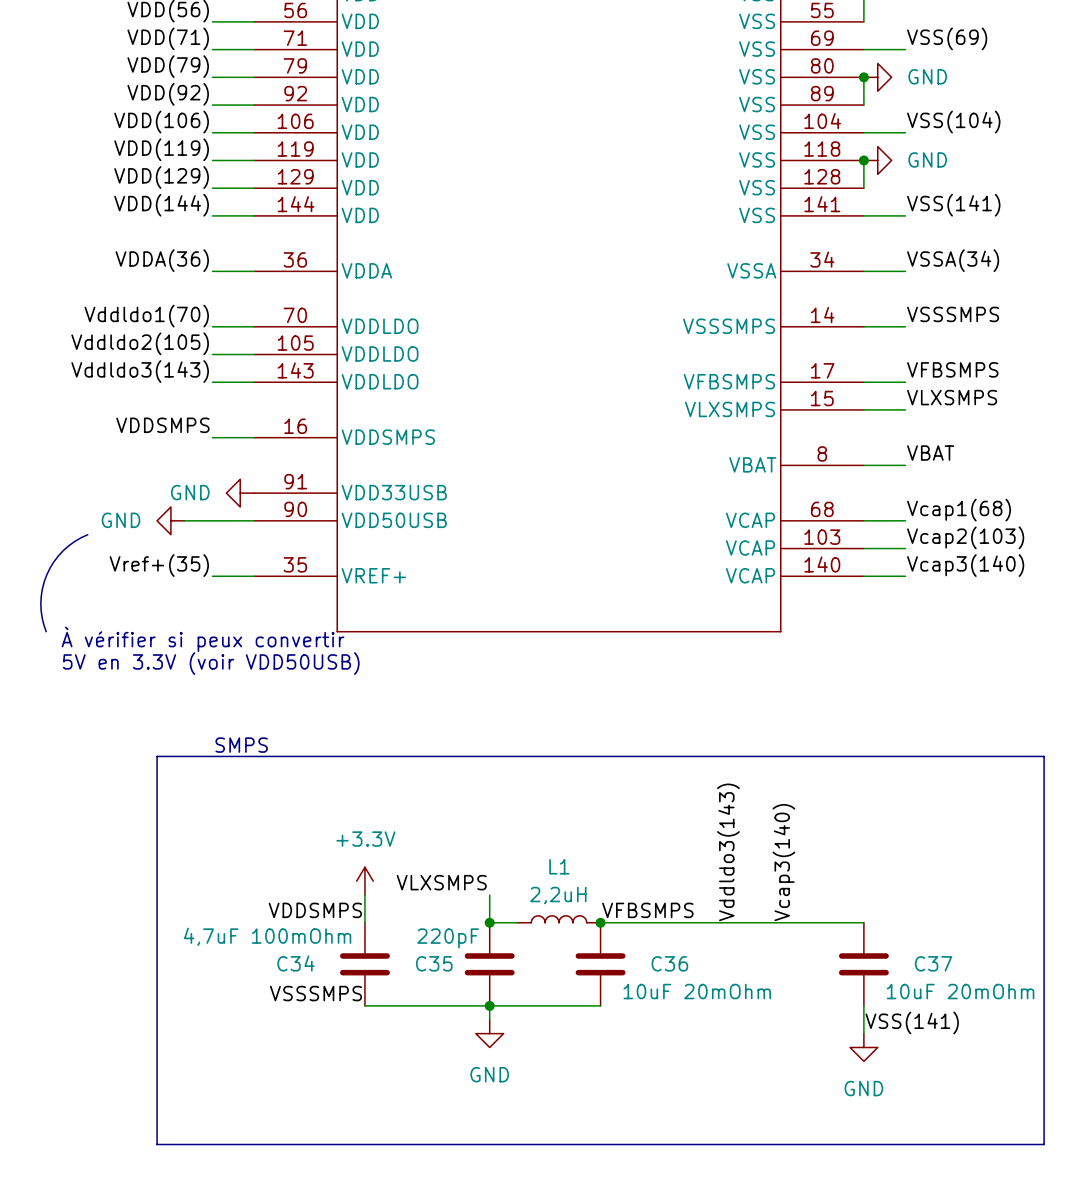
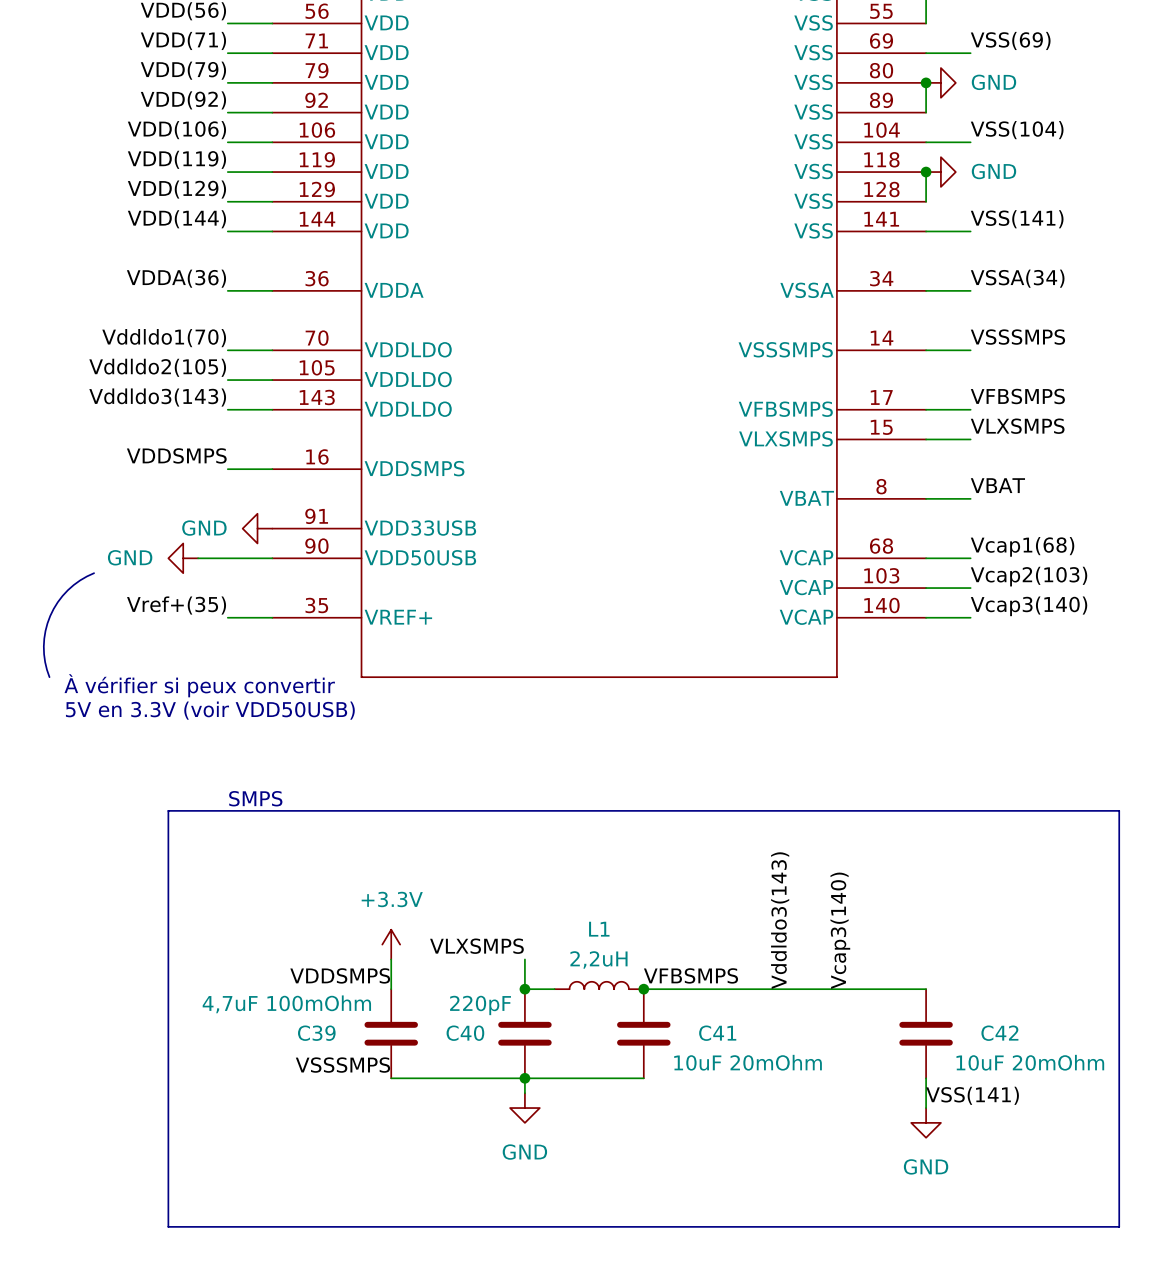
C34 name: C34 (295, 963) -> C39 (316, 1033)
C35 name: C35 (434, 963) -> C40 (465, 1033)
C36 name: C36 (669, 963) -> C41 (717, 1033)
C37 name: C37 (933, 963) -> C42 (999, 1033)

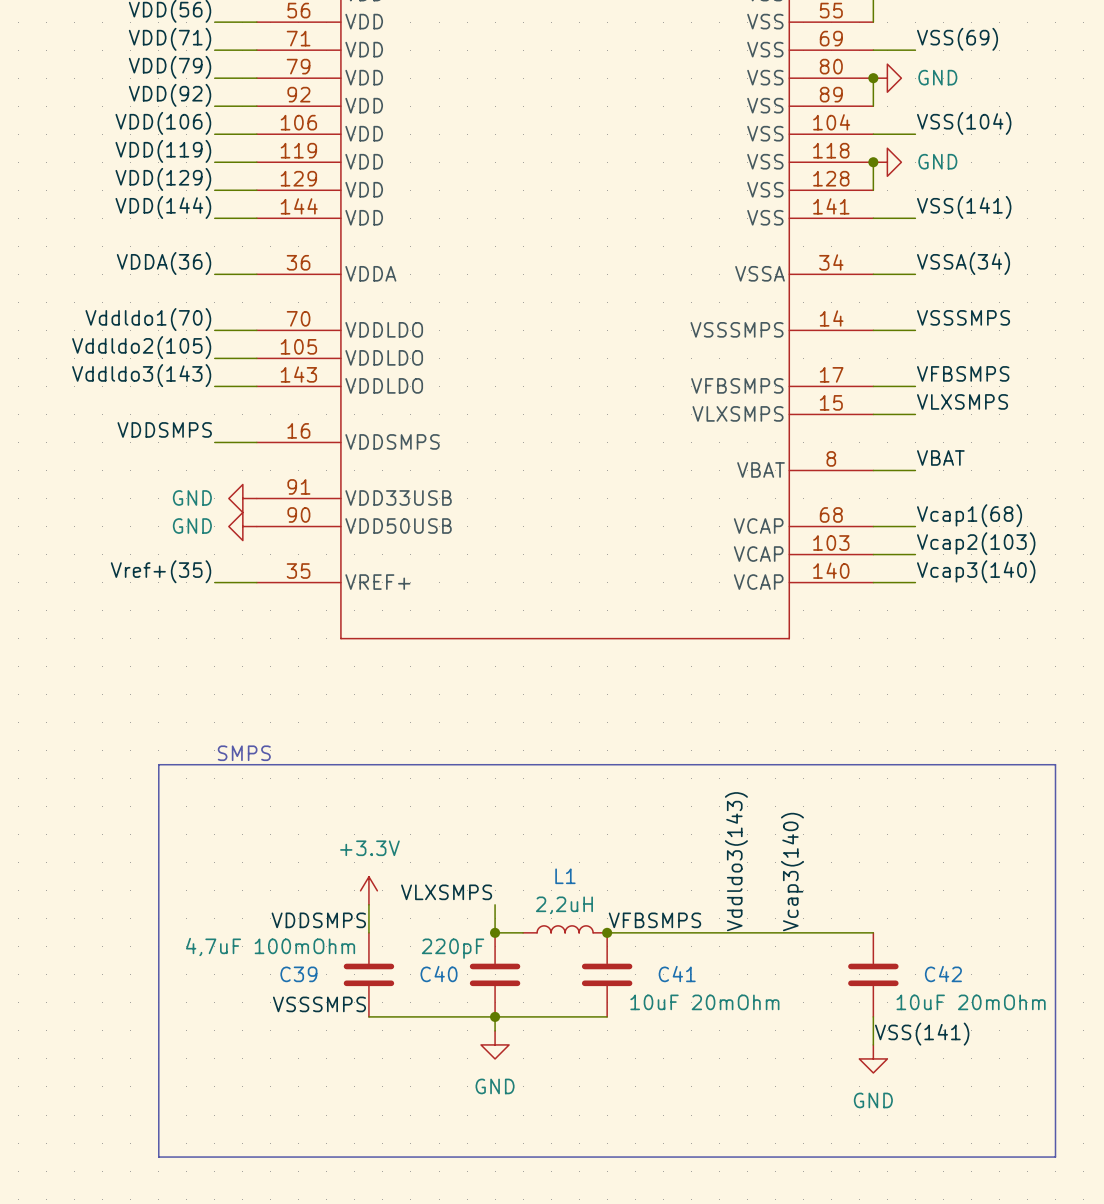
power symbol position: GND (183, 558) -> GND (242, 526)
wire: (198, 558) (272, 558) -> none
line: (94, 573) (80, 580) (67, 590) (57, 602) (50, 615) (45, 630) (43, 646) (45, 662) (49, 677) -> none
text: À vérifier si peux convertir (199, 685) -> none
text: 5V en 3.3V (voir VDD50USB) (210, 710) -> none

